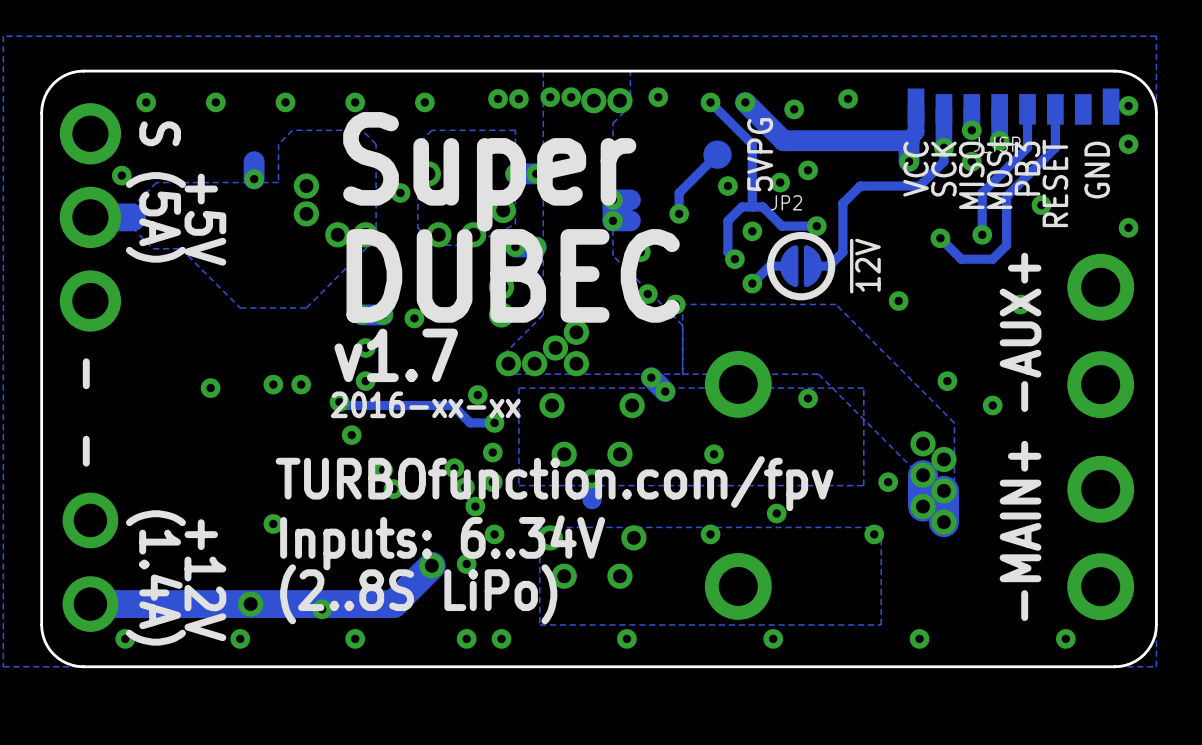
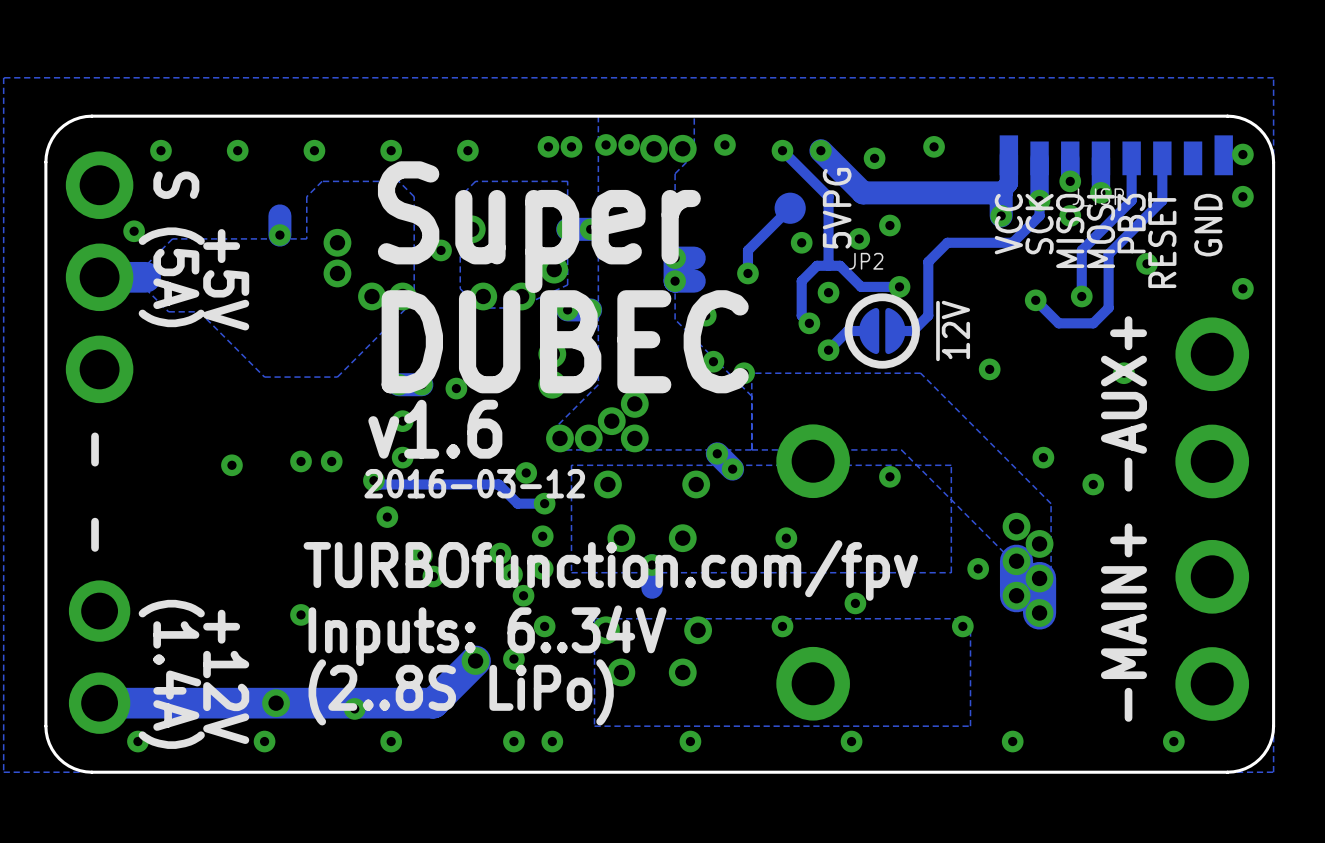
text: v1.7 (396, 355) -> v1.6 (435, 429)
text: 2016-xx-xx (425, 404) -> 2016-03-12 (474, 483)

